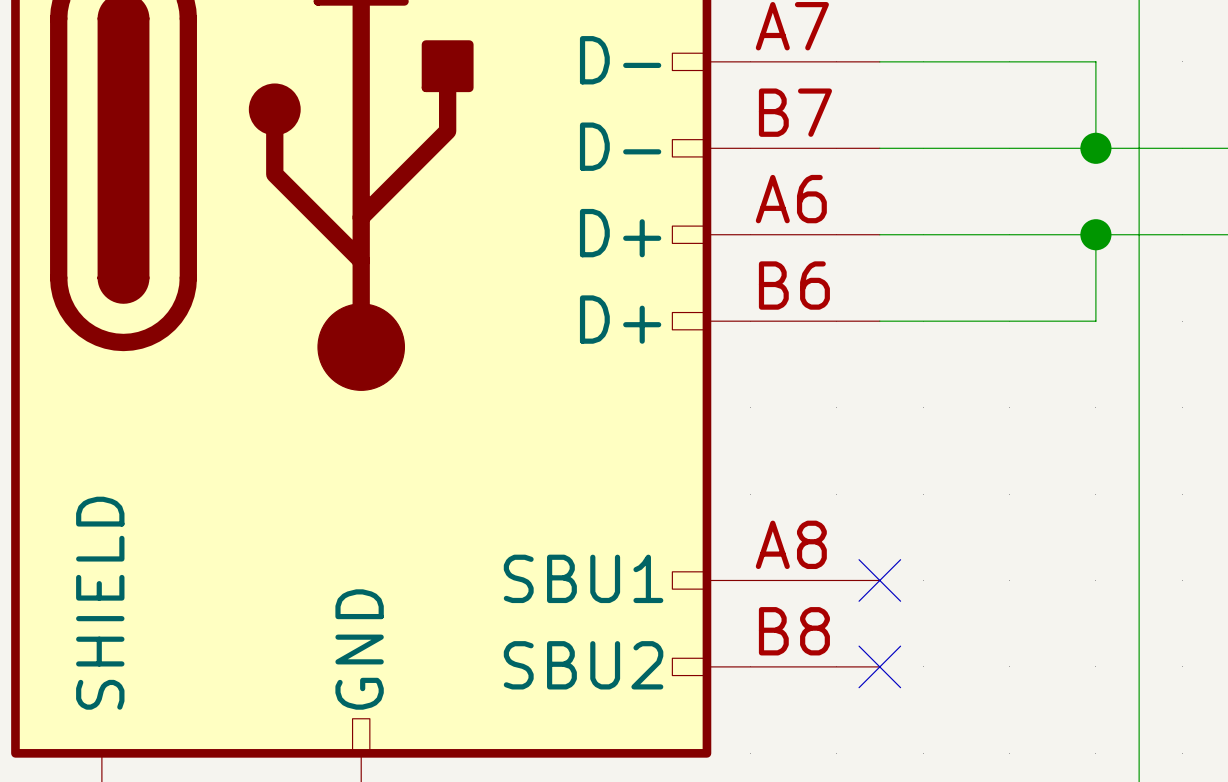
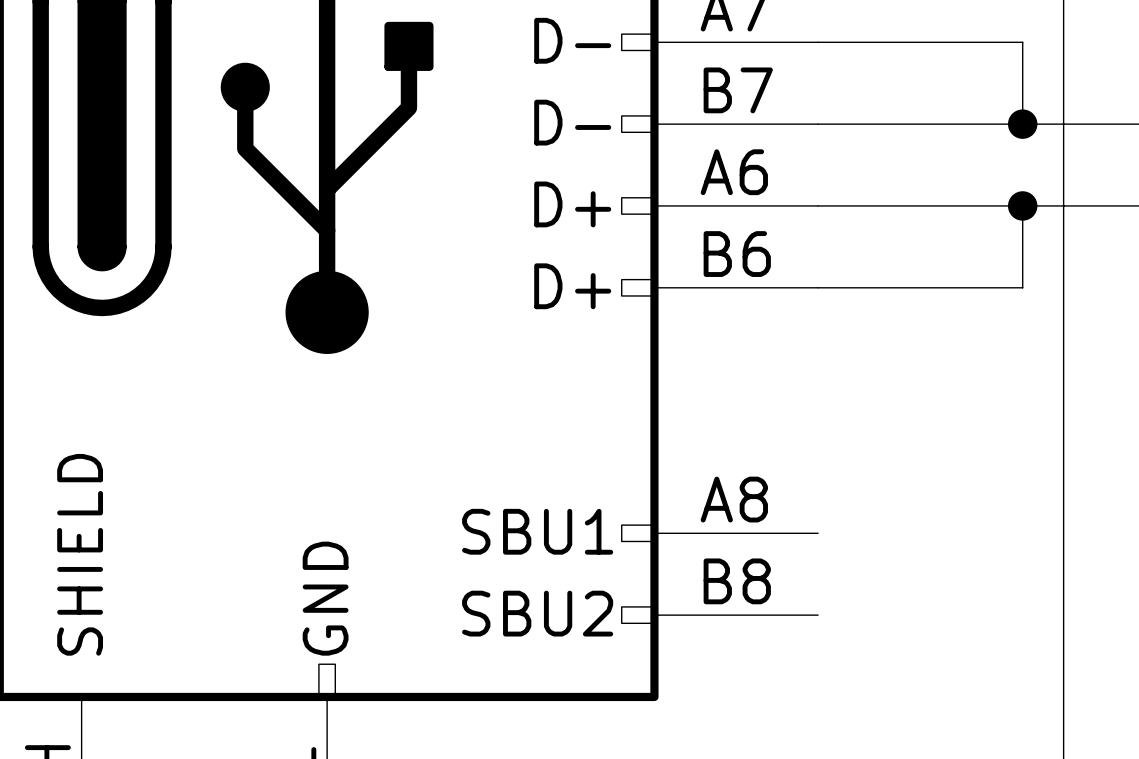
no-connect mark: (879, 580) -> none
no-connect mark: (879, 666) -> none

